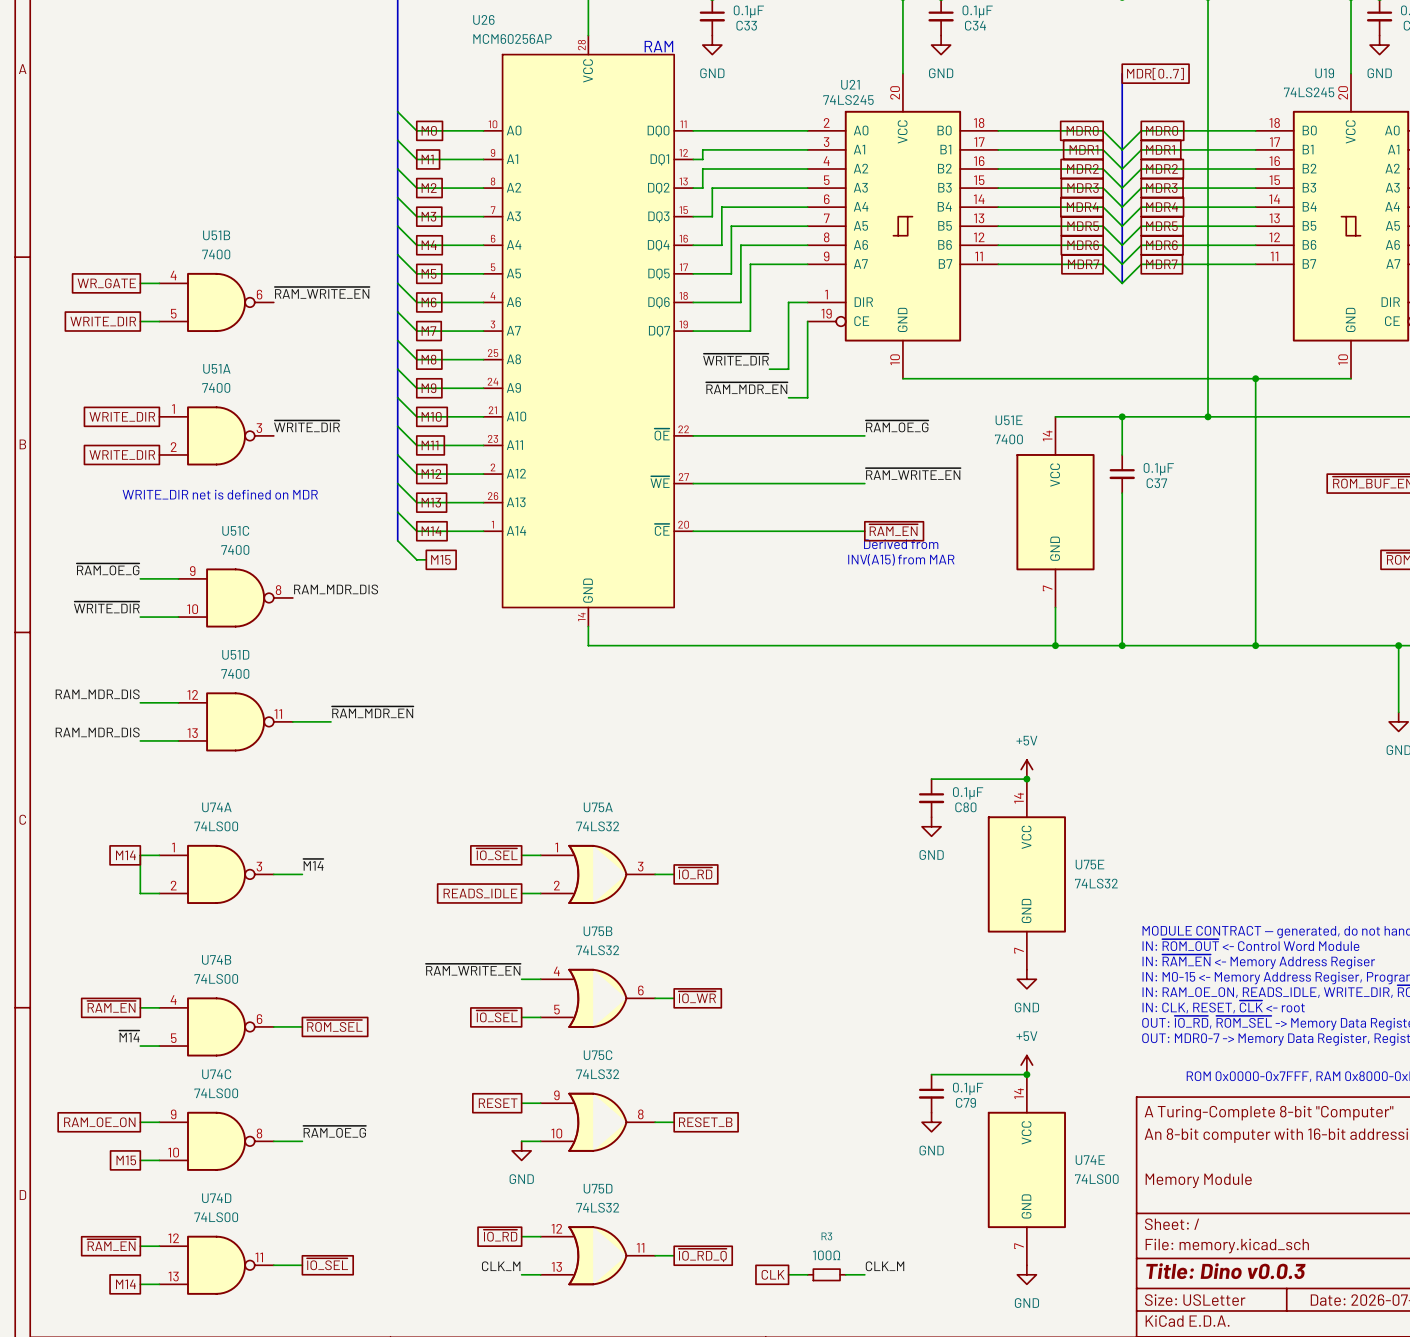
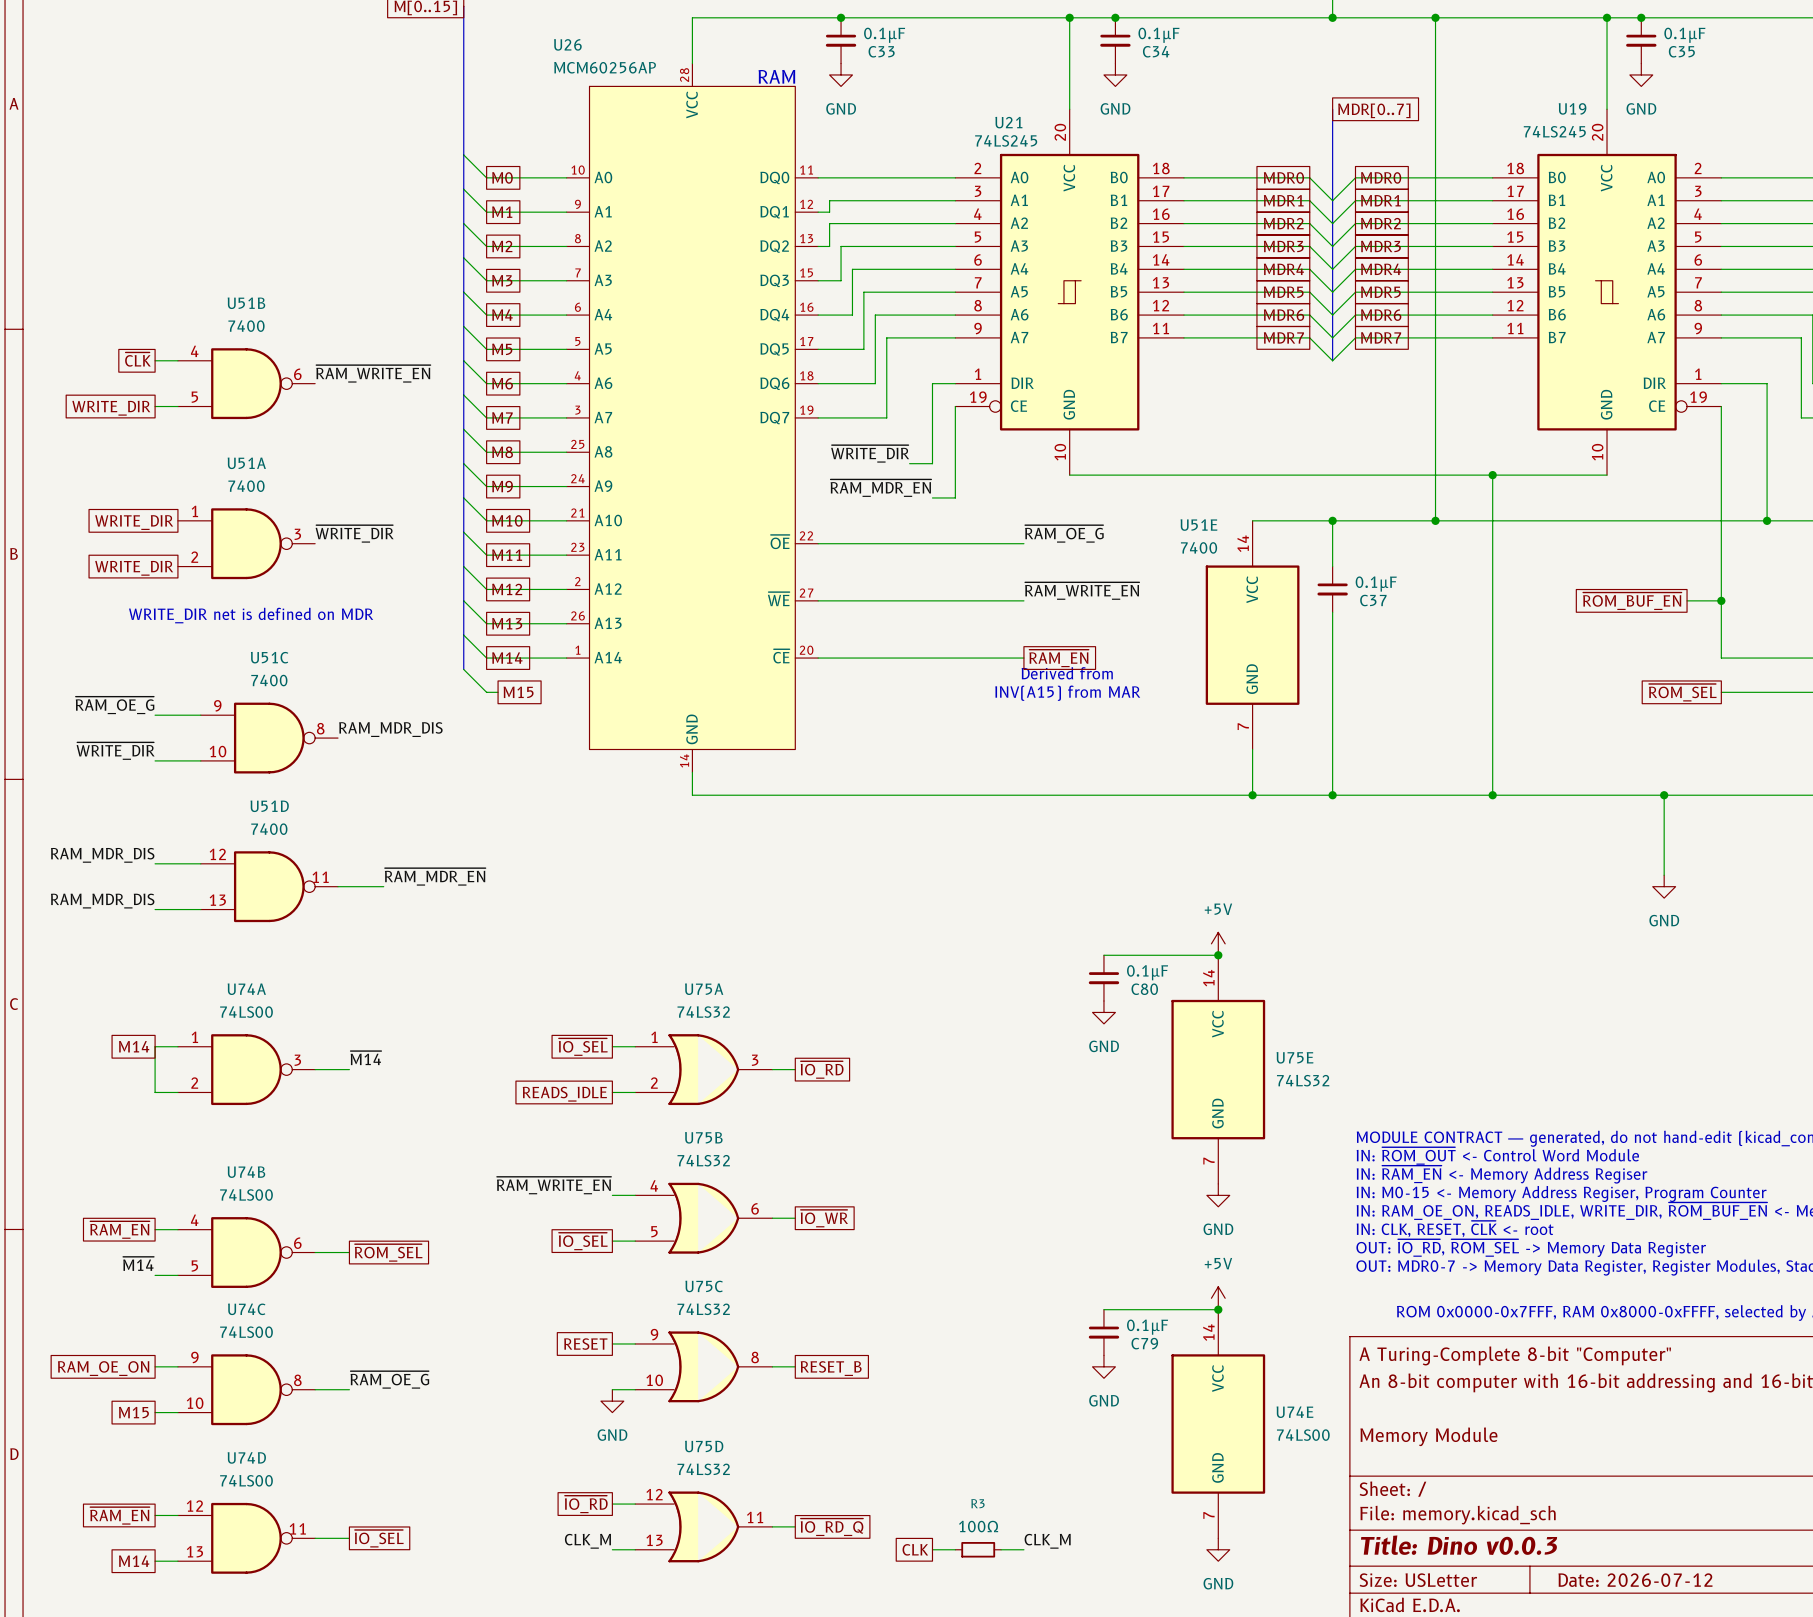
global label: WR_GATE (106, 283) -> ~{CLK} (137, 359)

